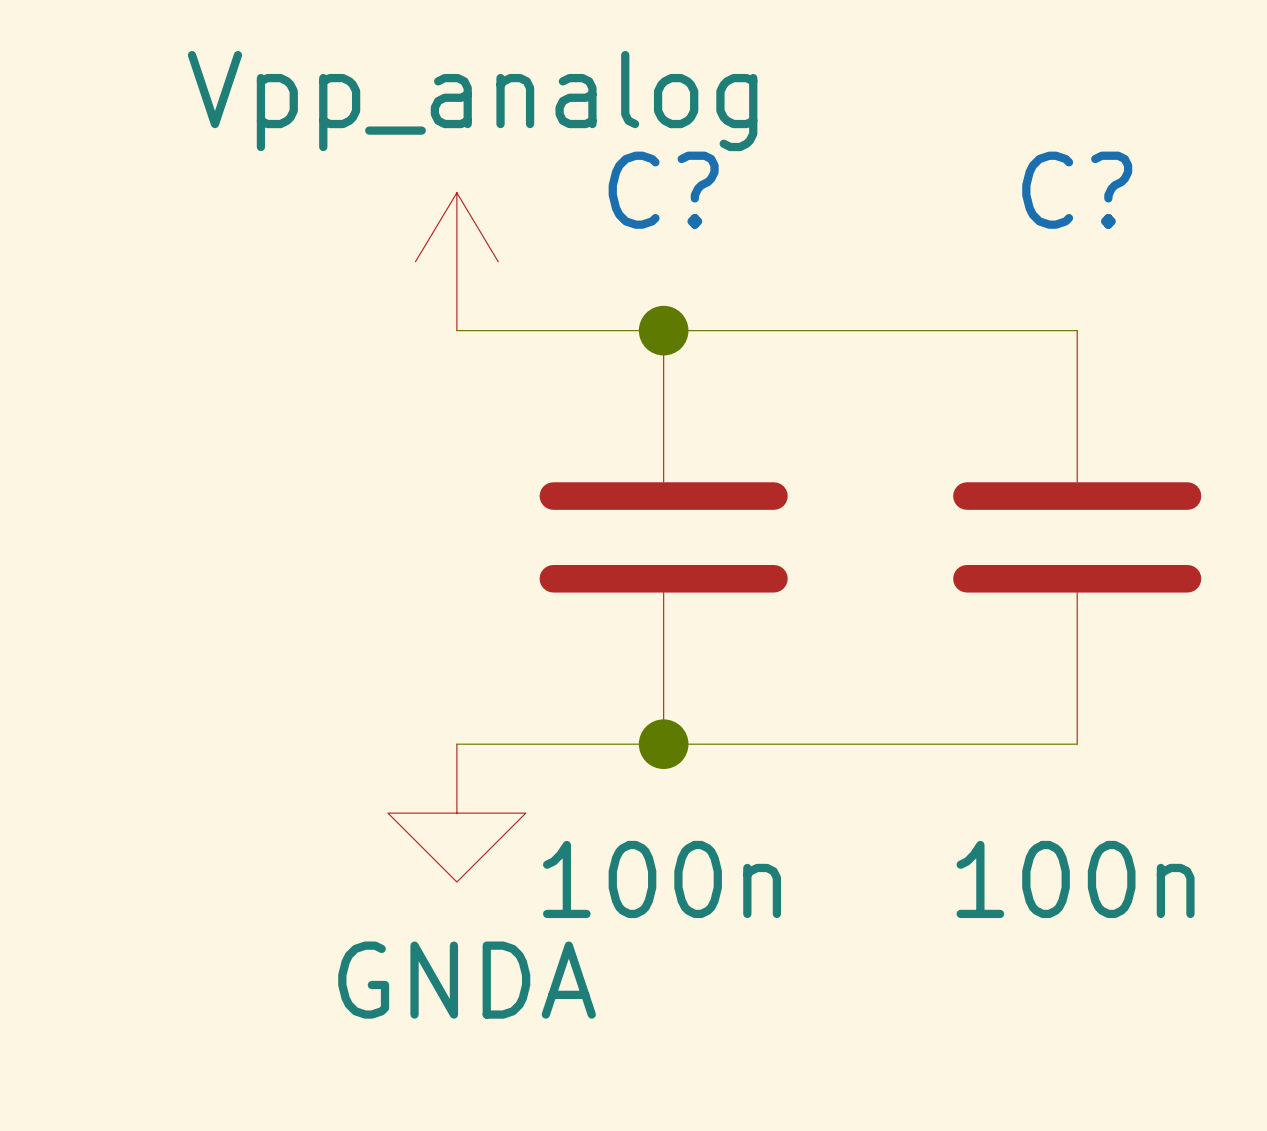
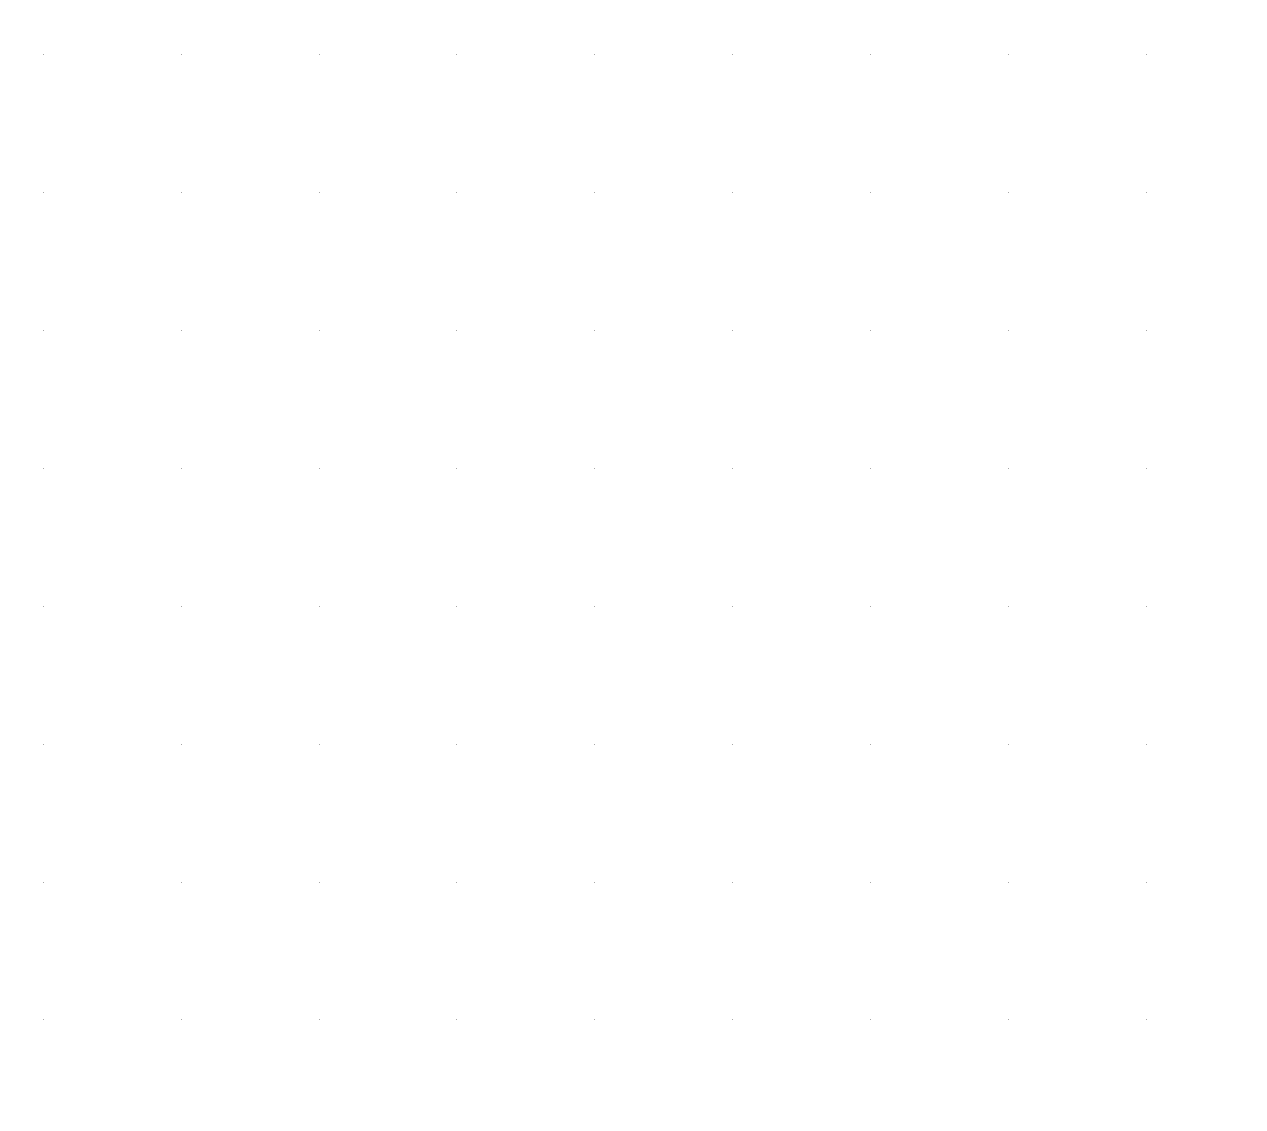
power symbol: Vpp_analog (456, 261) -> none
wire: (456, 330) (1077, 330) -> none
junction: (663, 330) -> none
C?: 100n (663, 537) -> none
C?: 100n (1077, 537) -> none
wire: (456, 744) (1077, 744) -> none
junction: (663, 744) -> none
power symbol: GNDA (456, 813) -> none

